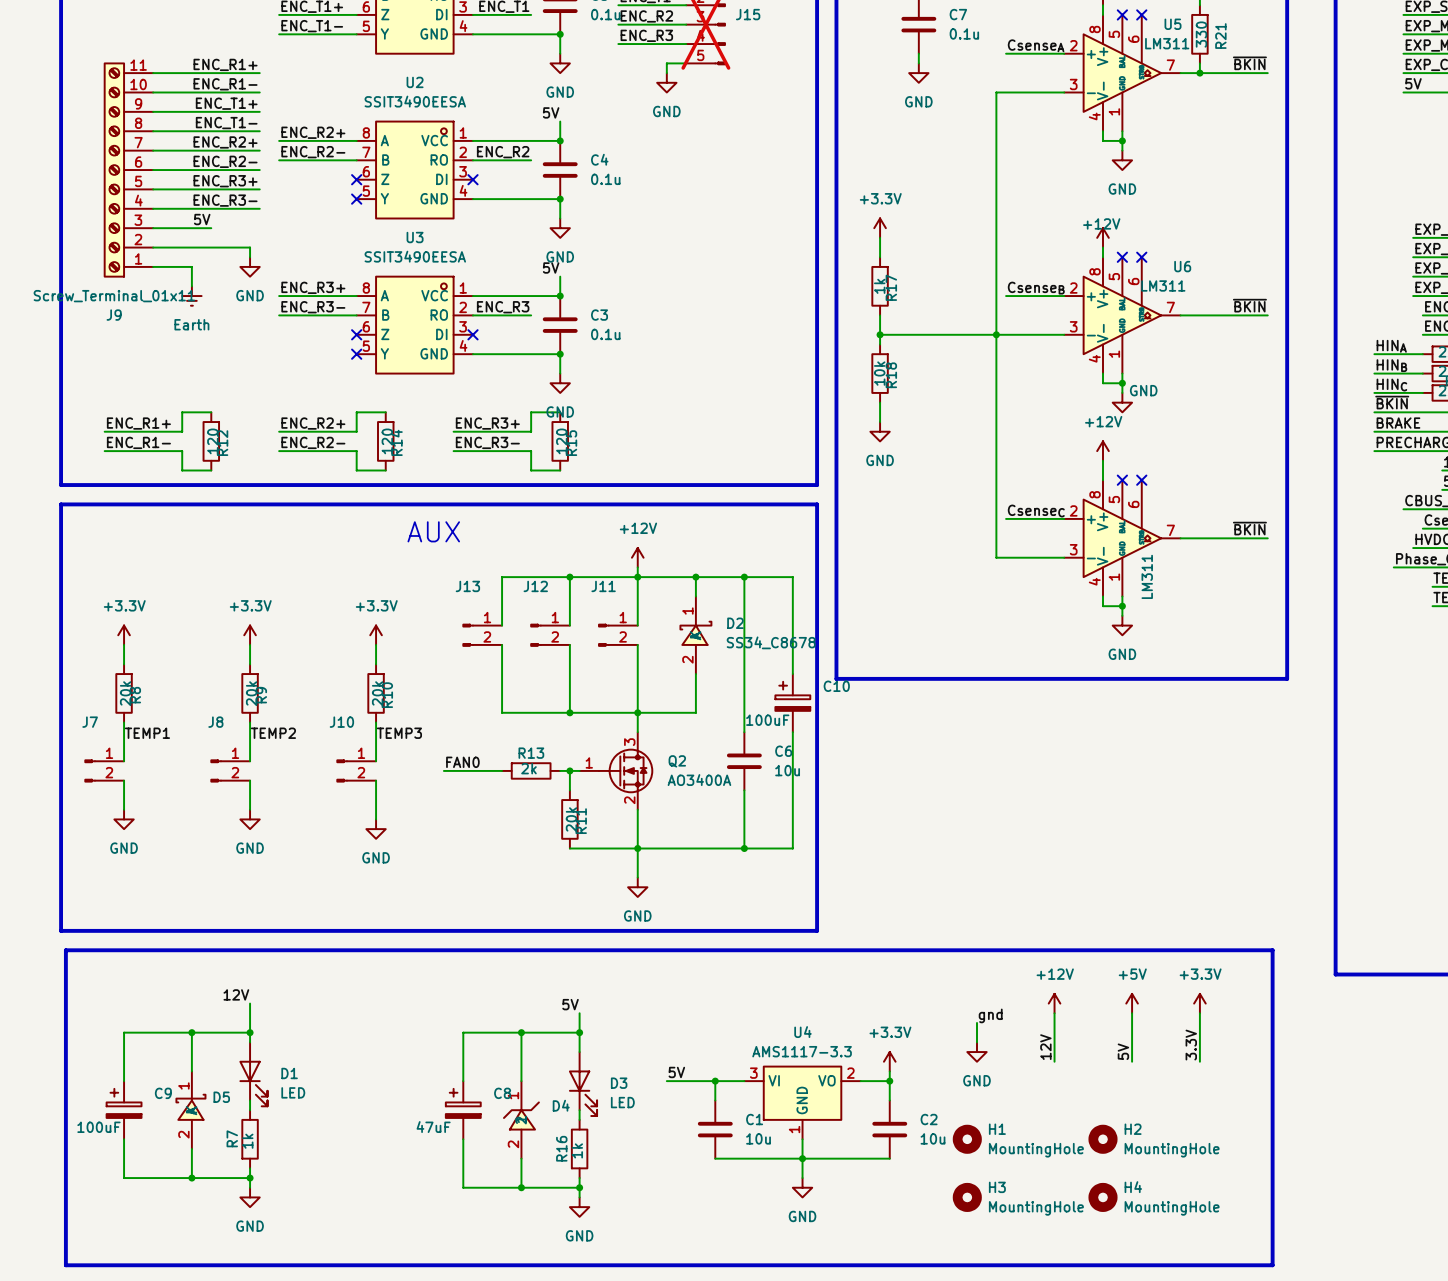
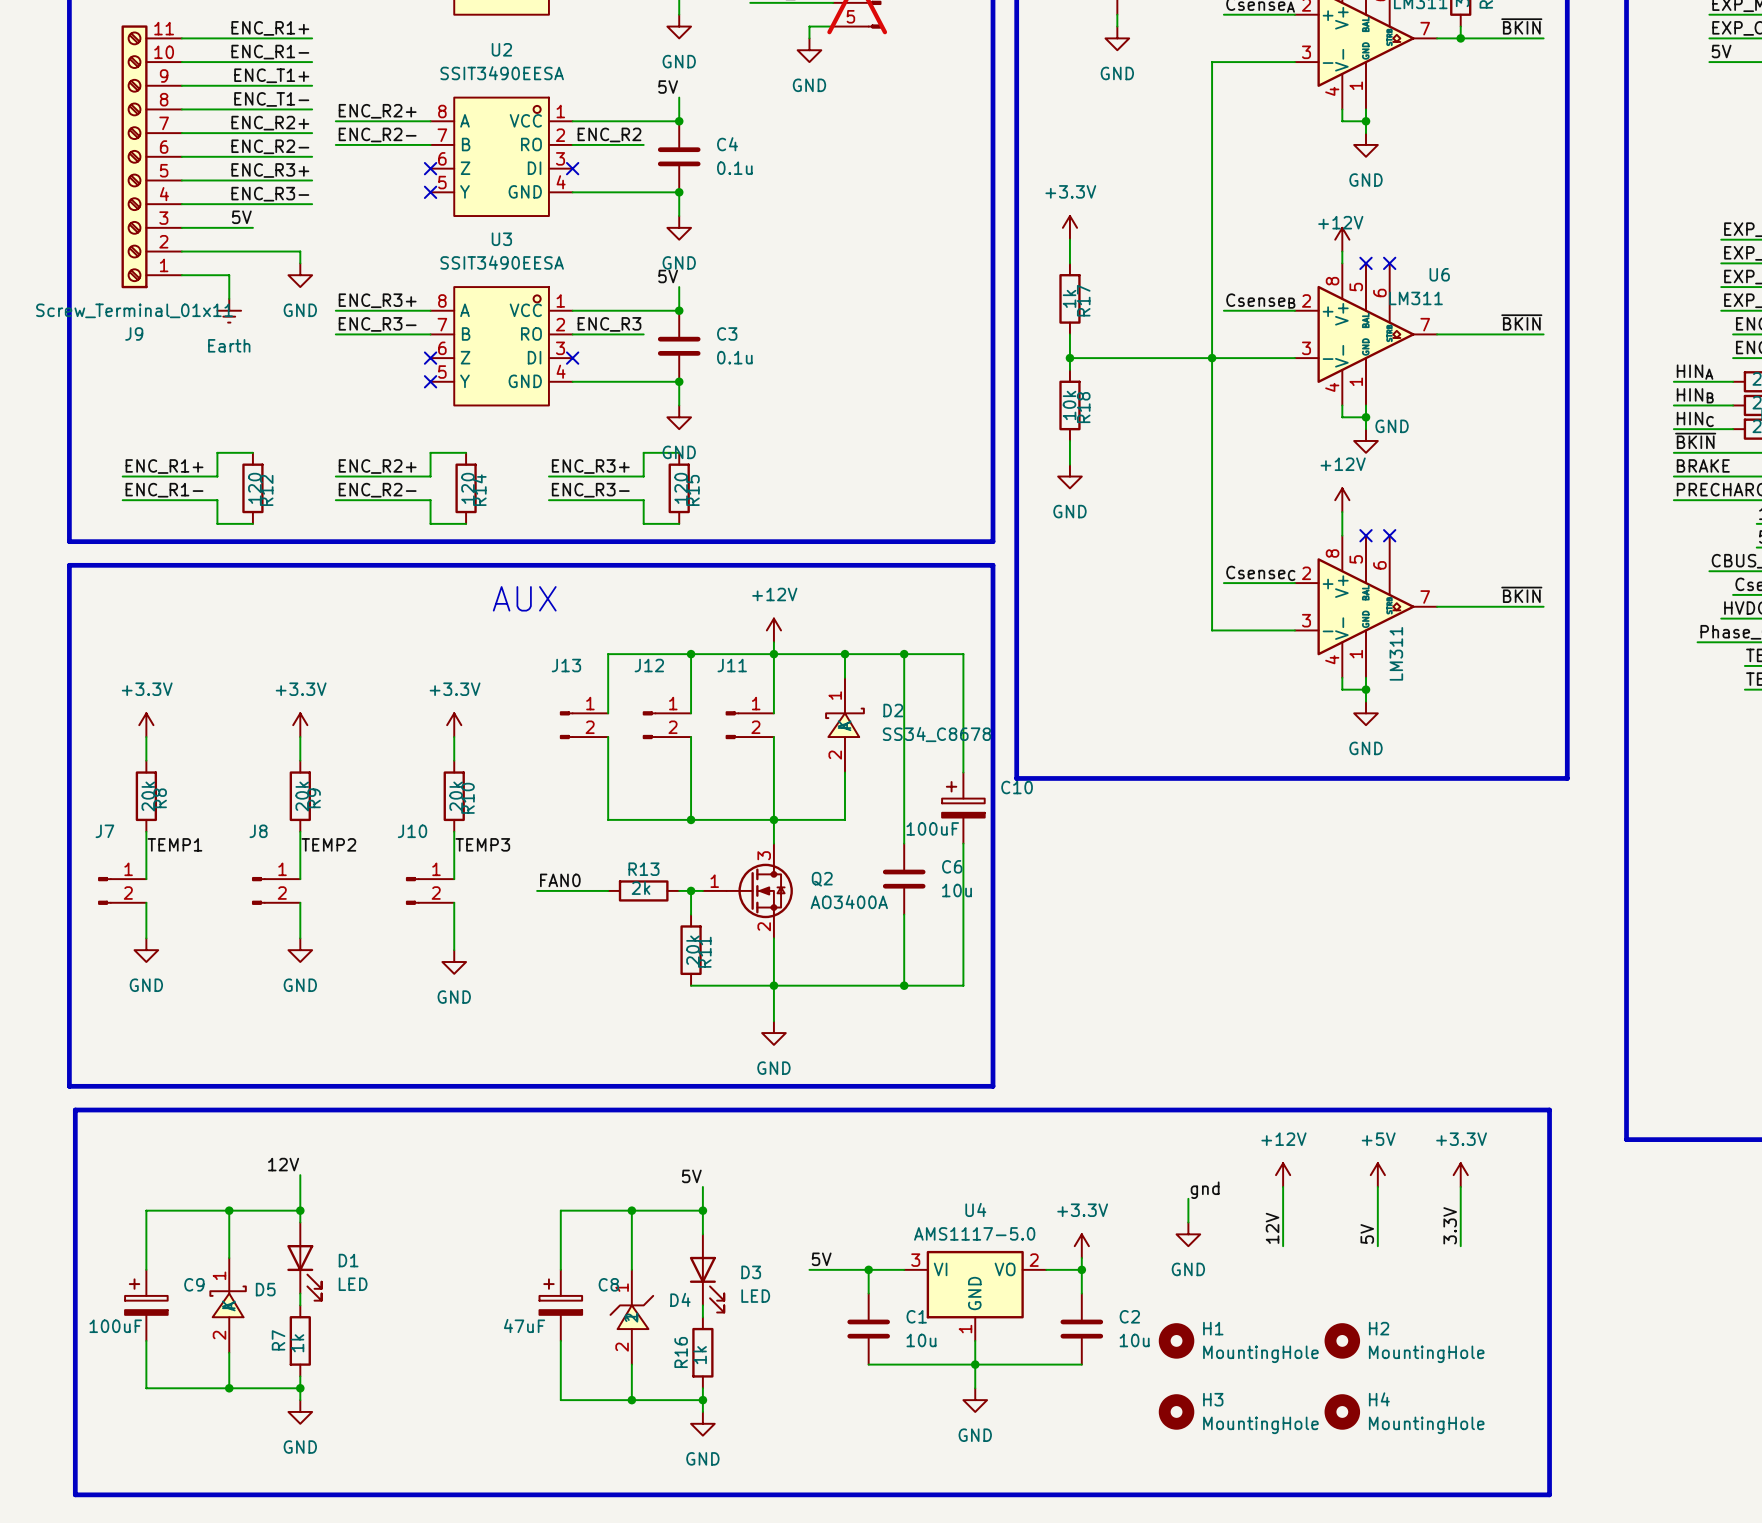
U4 value: AMS1117-3.3 (802, 1051) -> AMS1117-5.0 (974, 1233)

